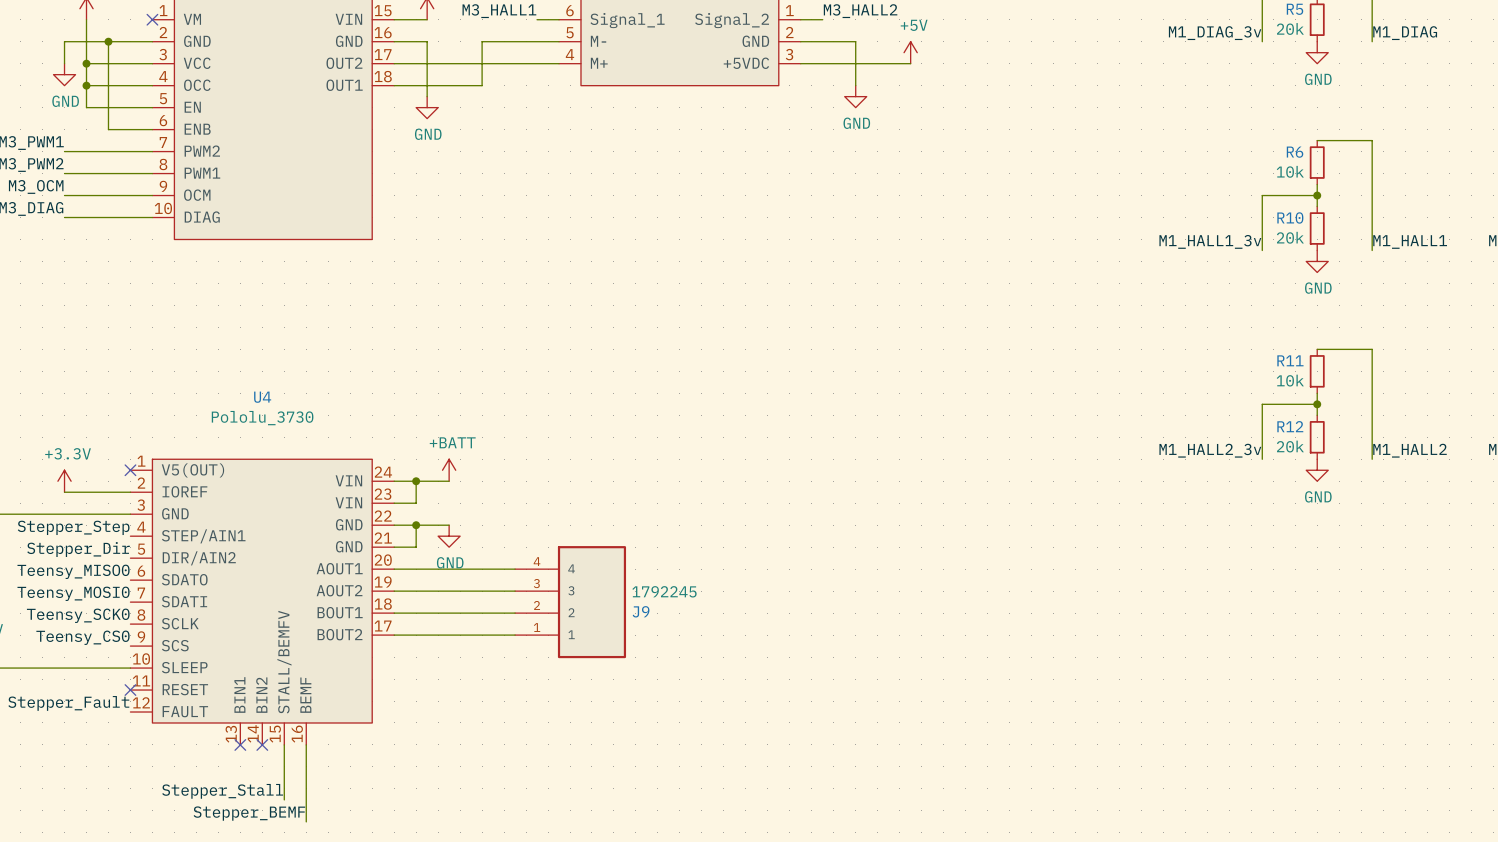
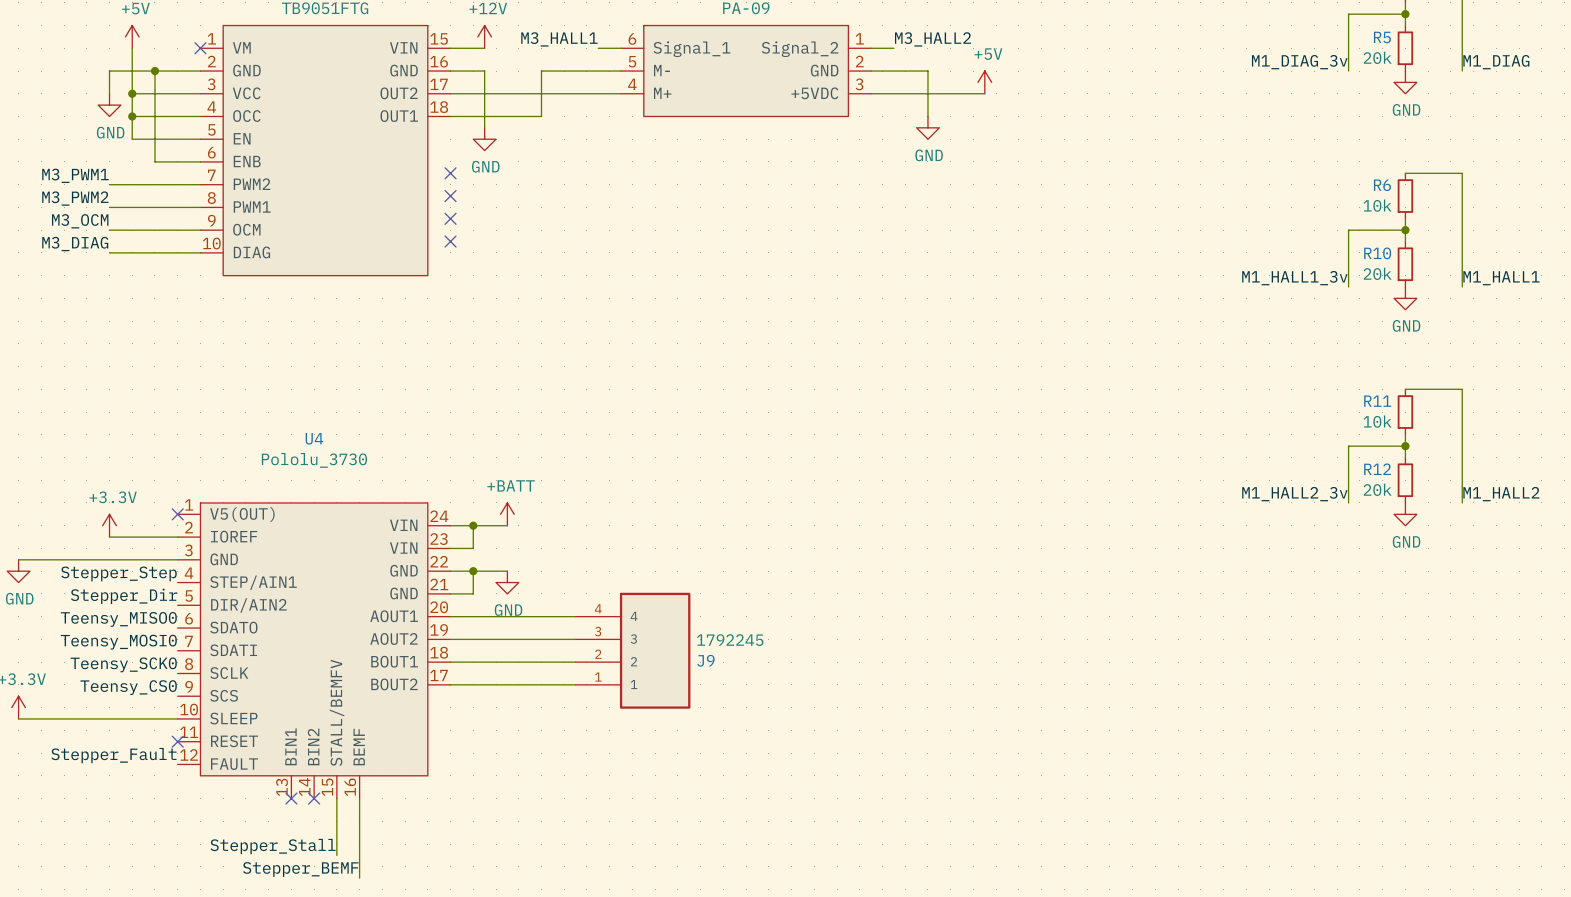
no-connect mark: none -> (450, 173)
no-connect mark: none -> (450, 196)
no-connect mark: none -> (450, 218)
no-connect mark: none -> (450, 241)

